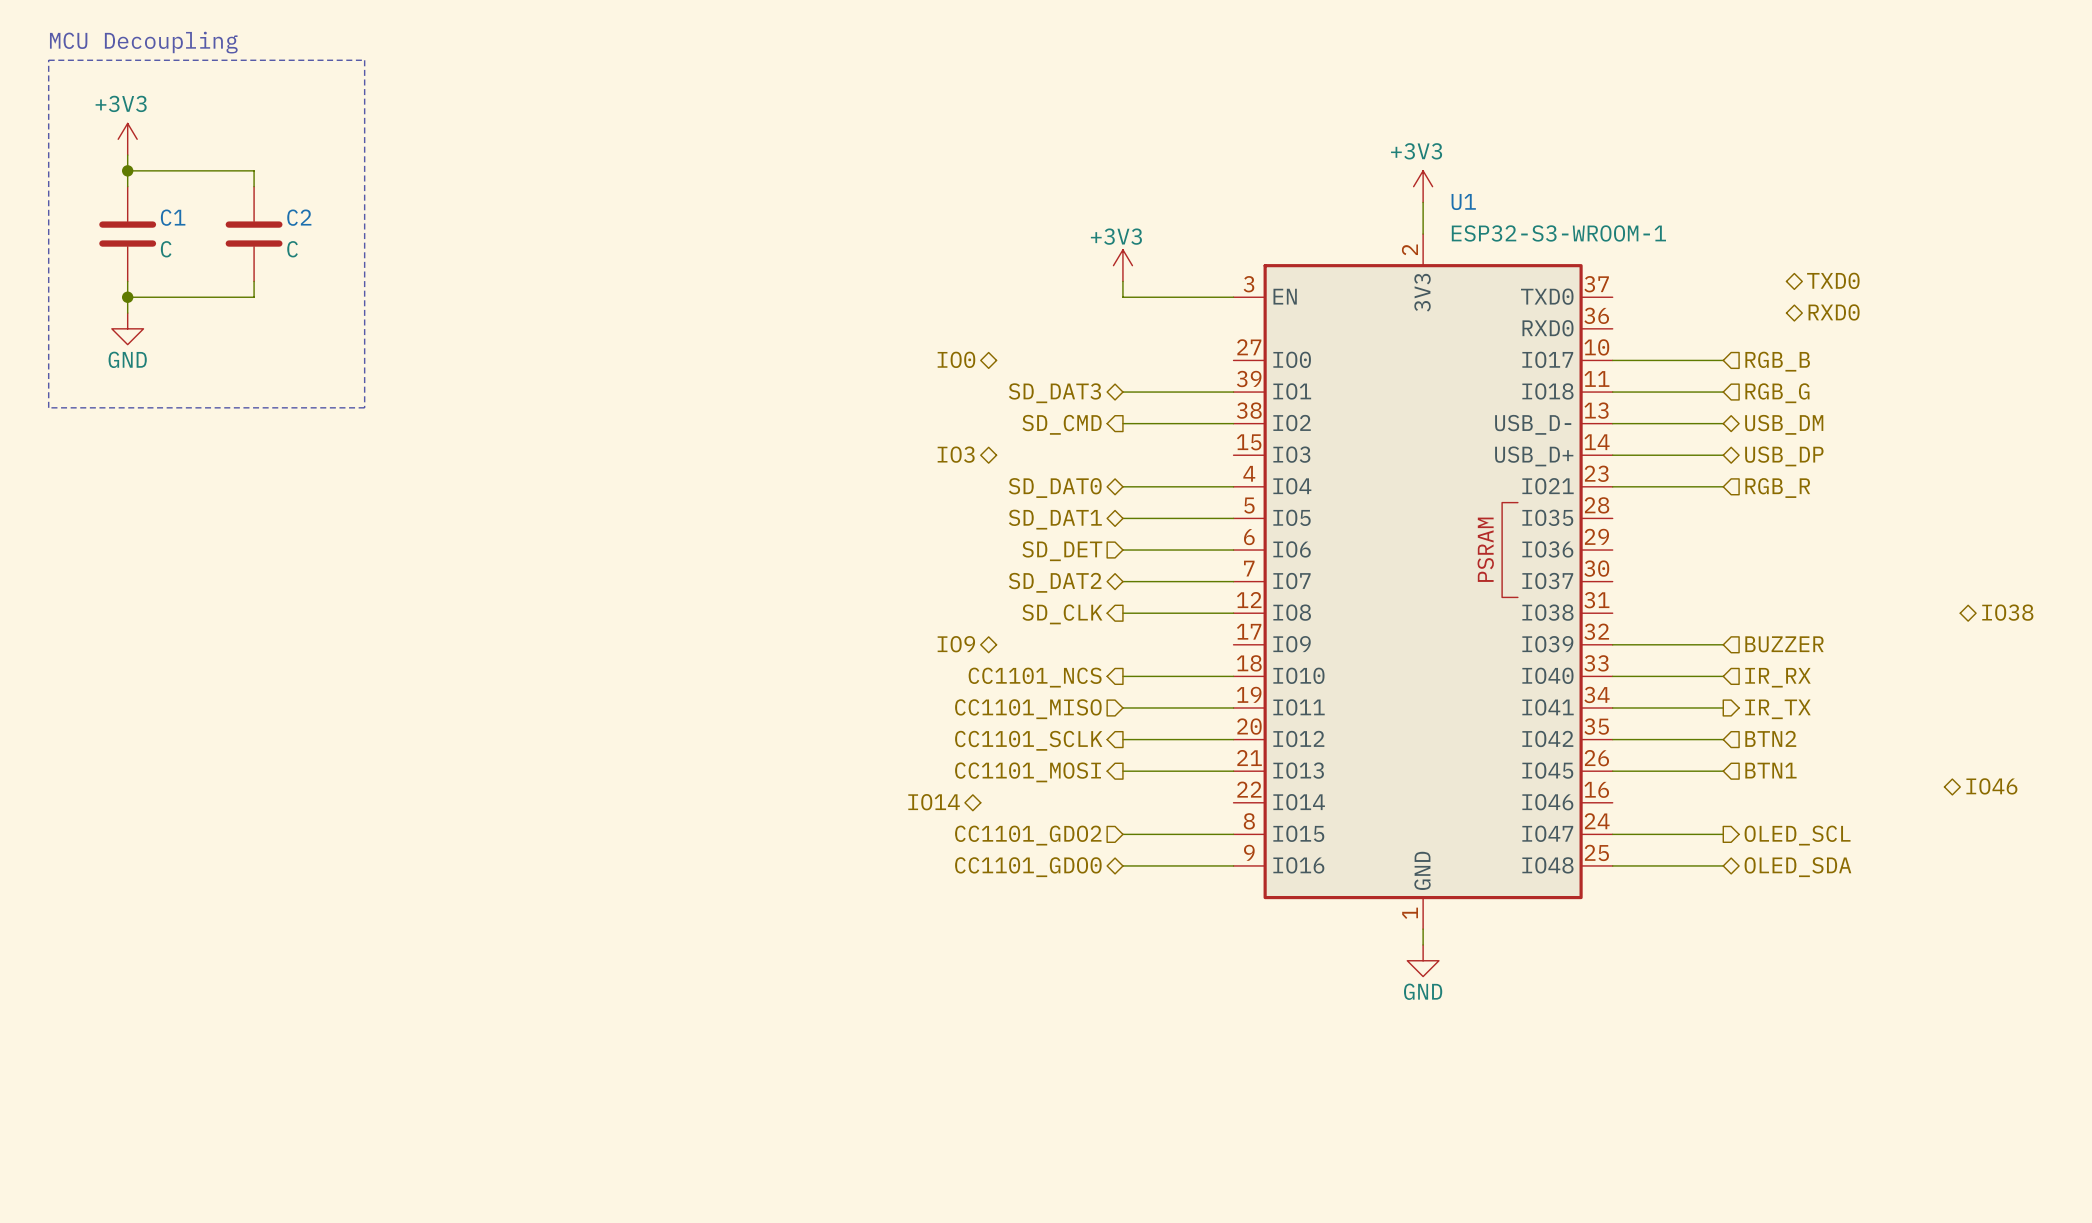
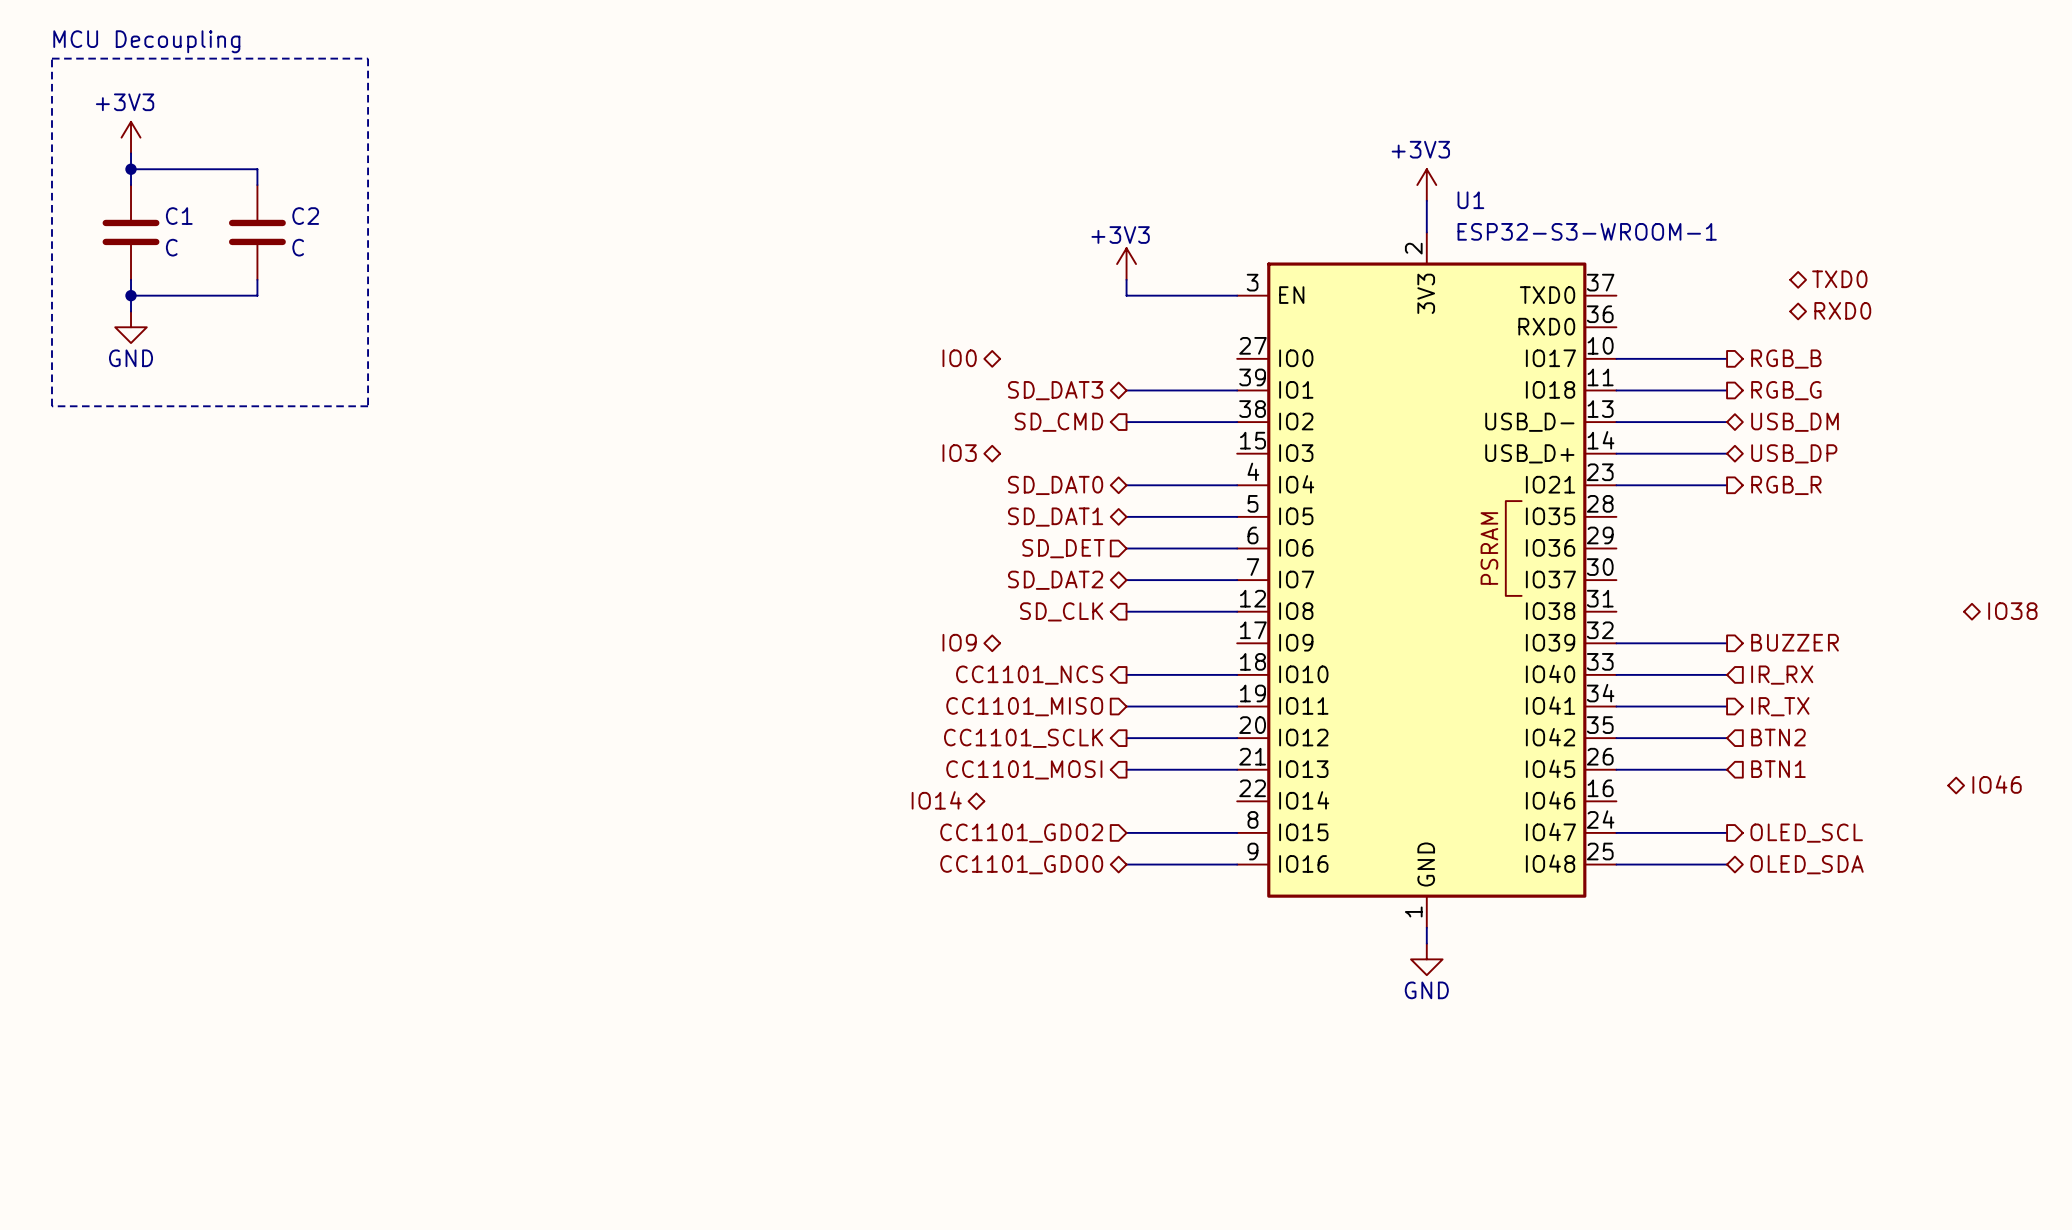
hierarchical label shape: input (1777, 361) -> output (1786, 359)
hierarchical label shape: input (1777, 393) -> output (1786, 390)
hierarchical label shape: input (1777, 488) -> output (1786, 485)
hierarchical label shape: input (1784, 644) -> output (1795, 642)

